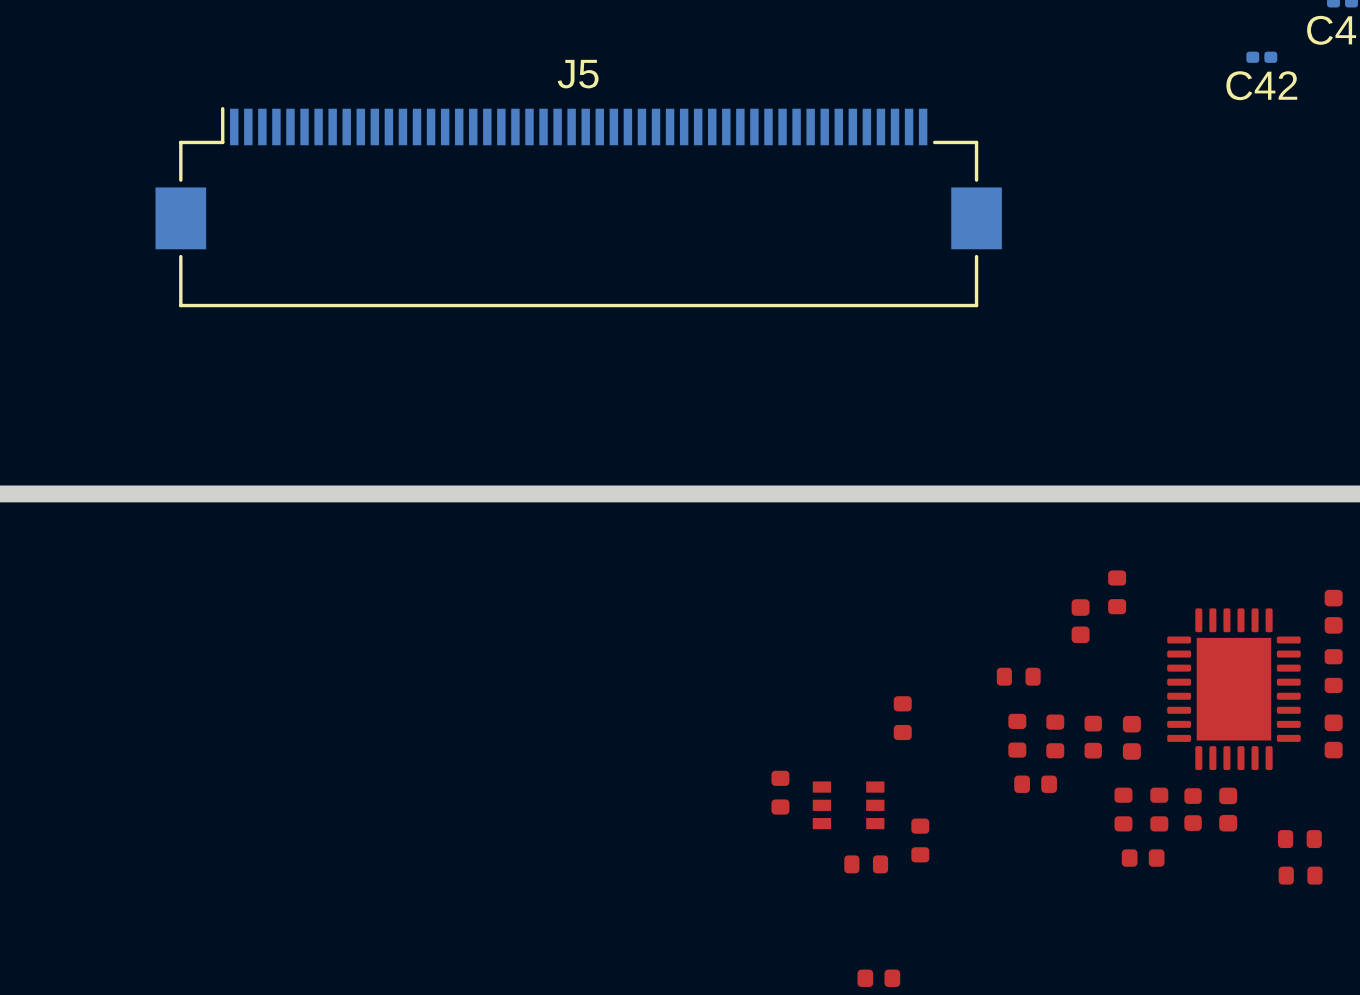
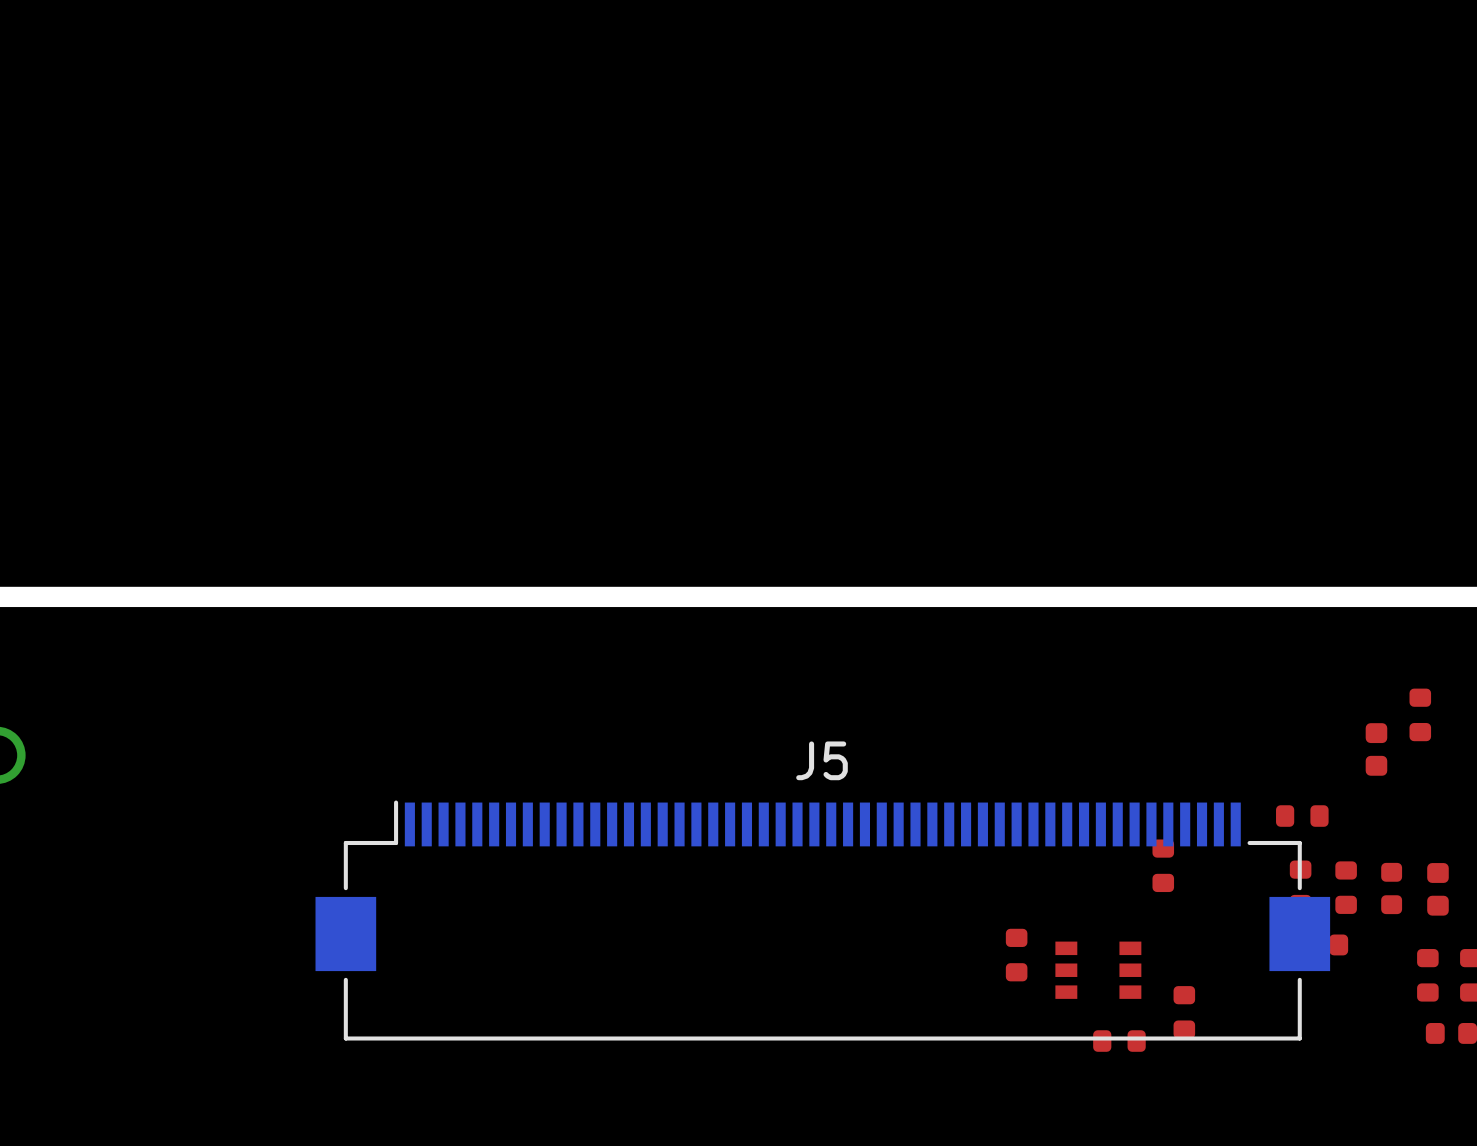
J5 position: (578, 207) -> (822, 920)

